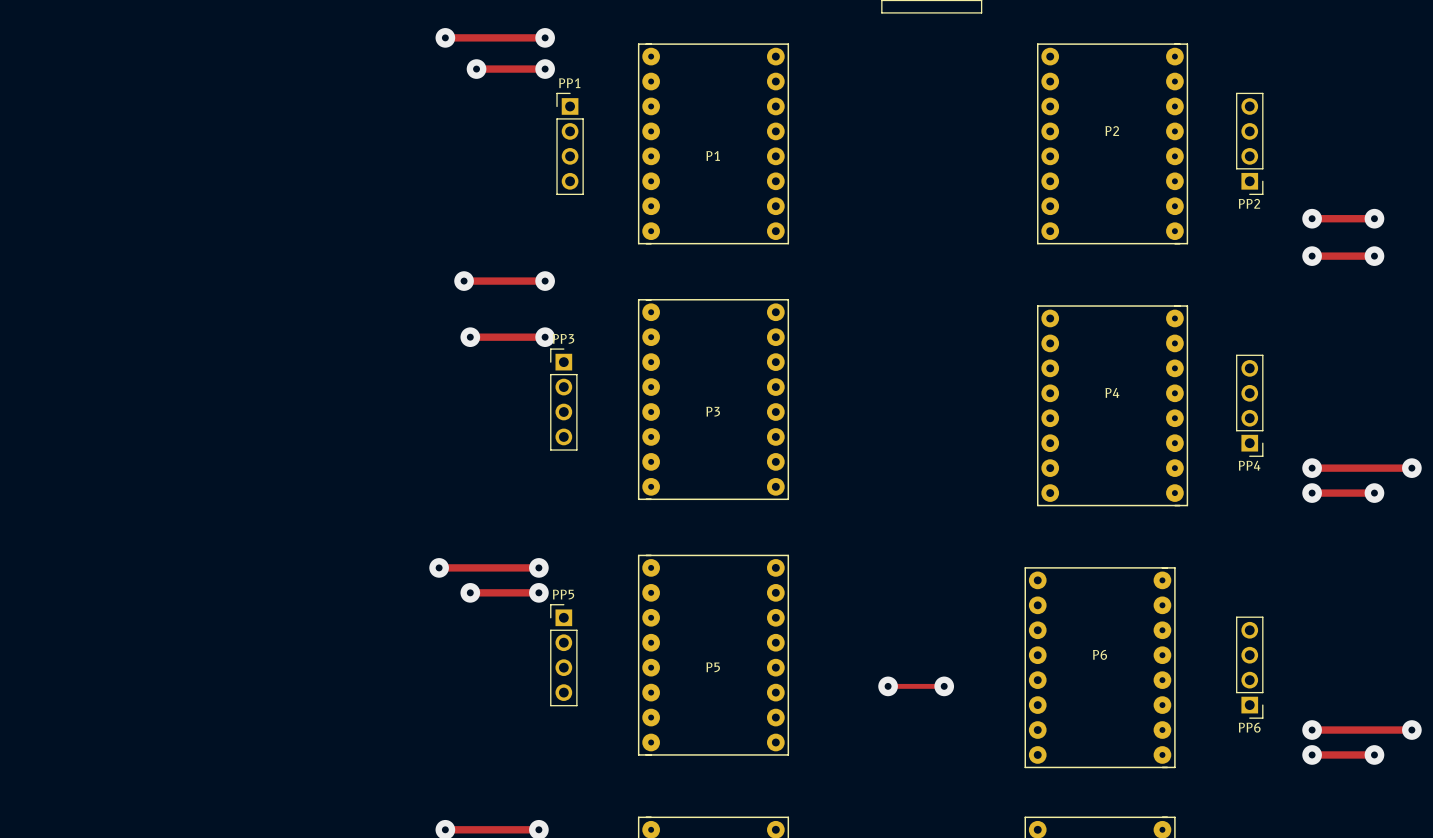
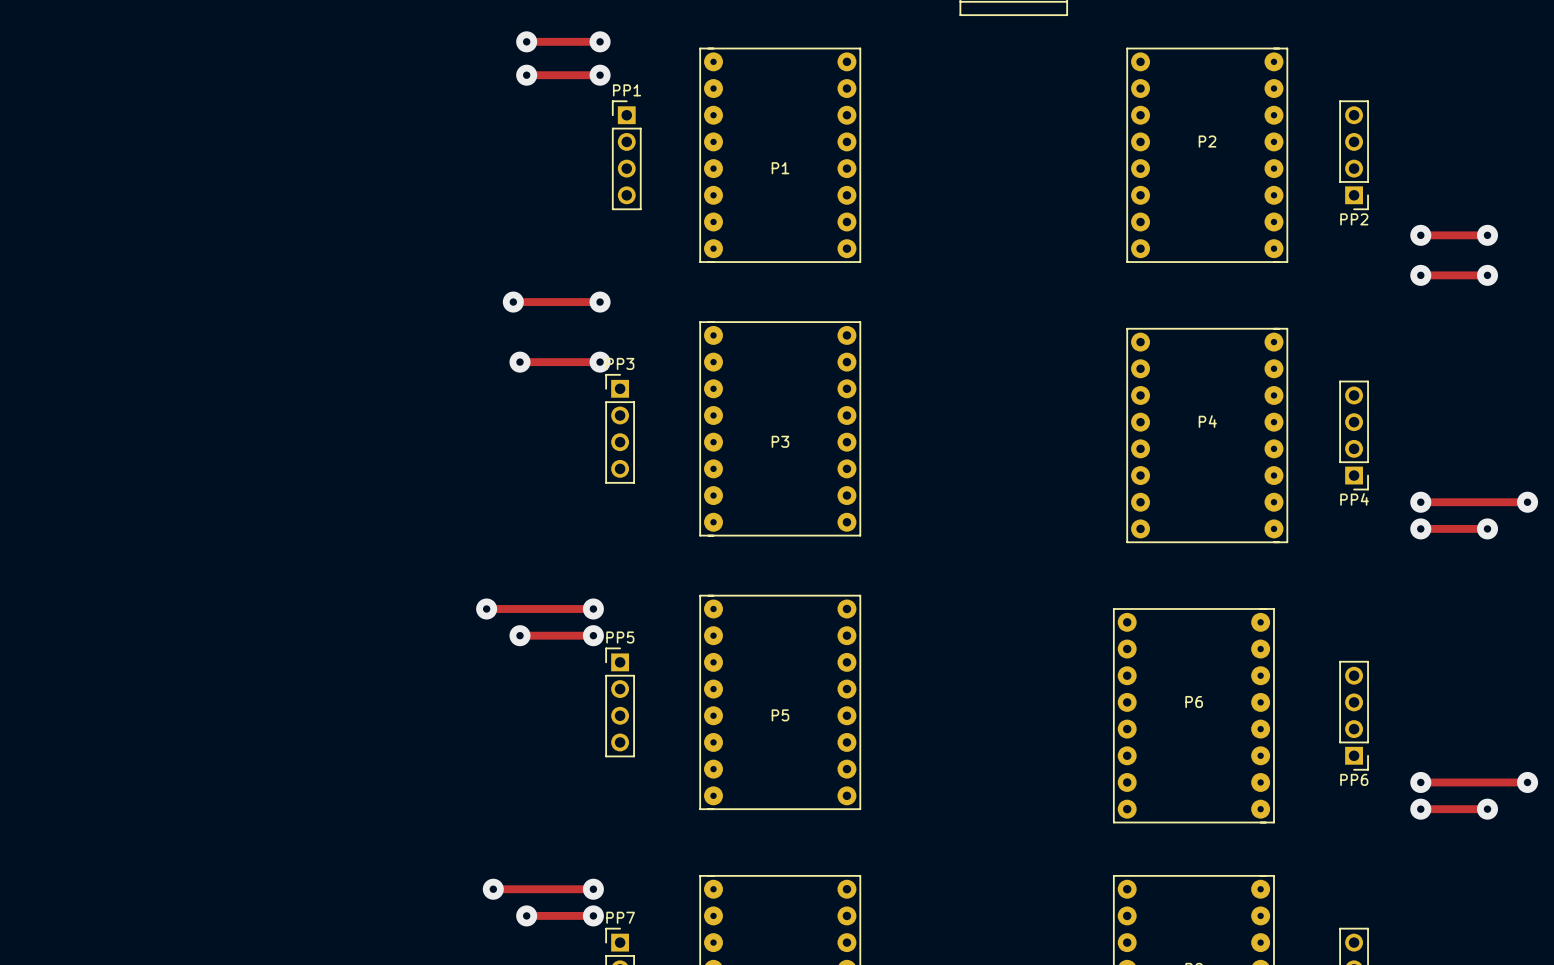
track: (445, 37) (476, 37) -> none
via position: (445, 37) -> (526, 41)
track: (888, 686) (944, 686) -> none
via: (888, 686) -> none
via: (944, 686) -> none

